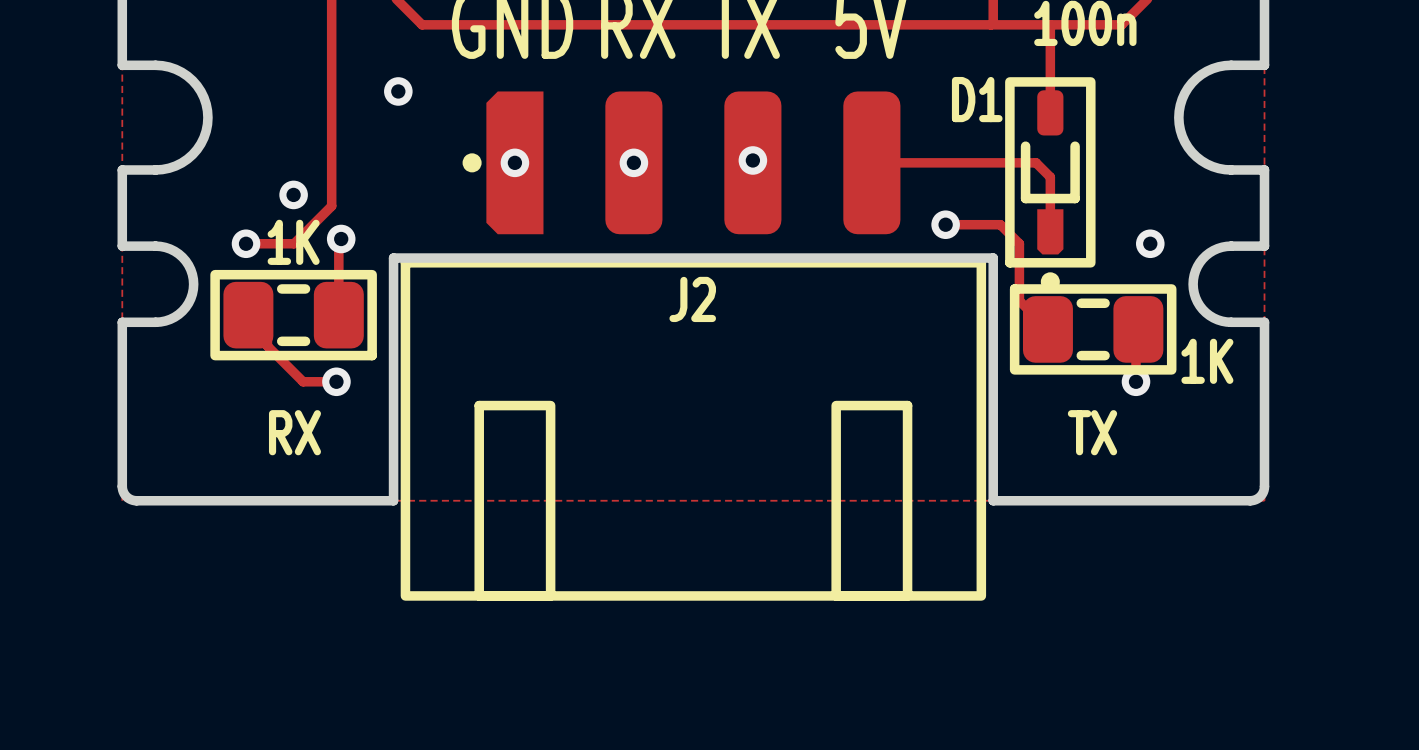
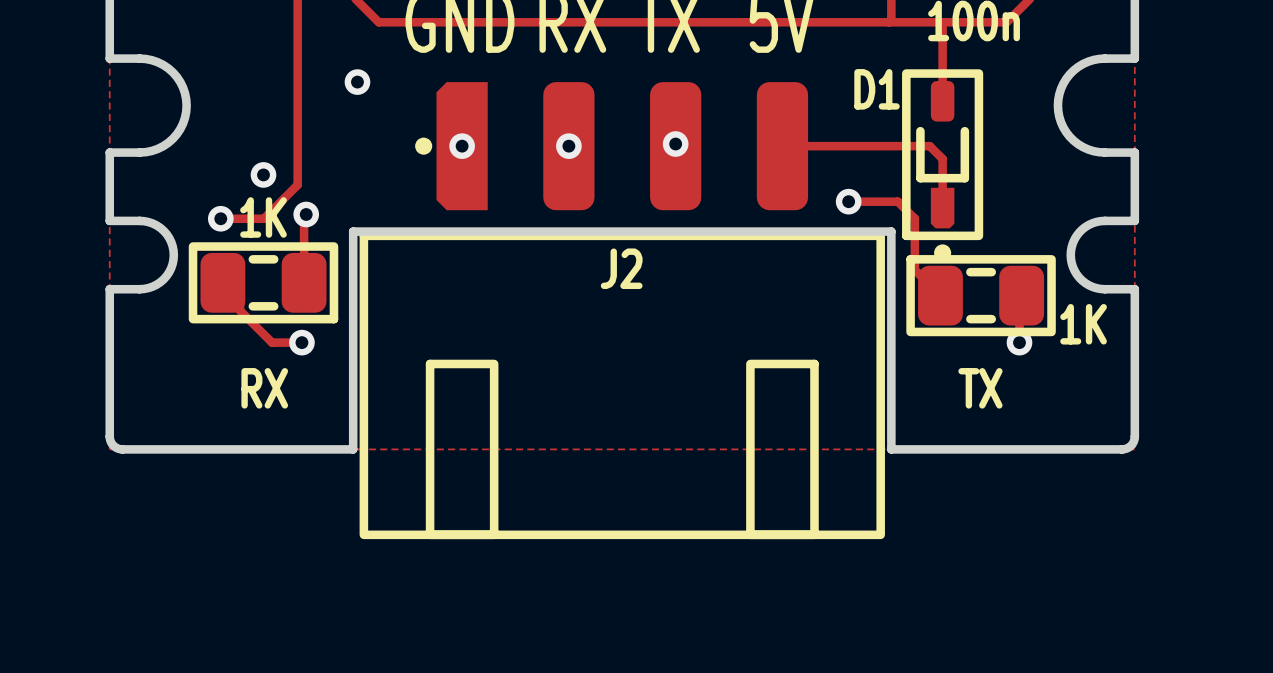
via: (1150, 243) -> none

